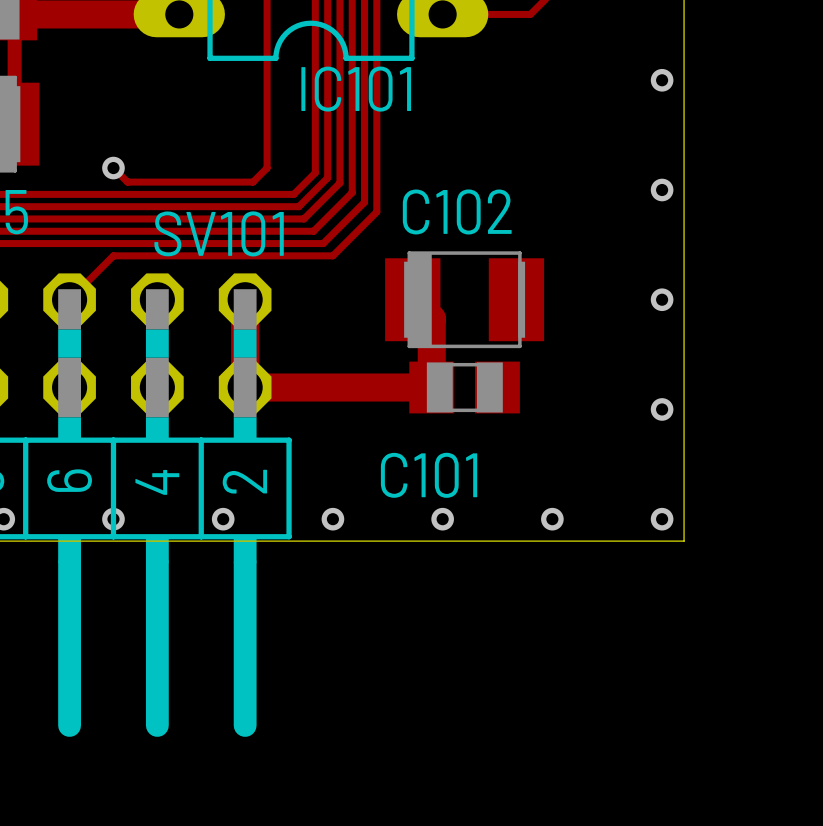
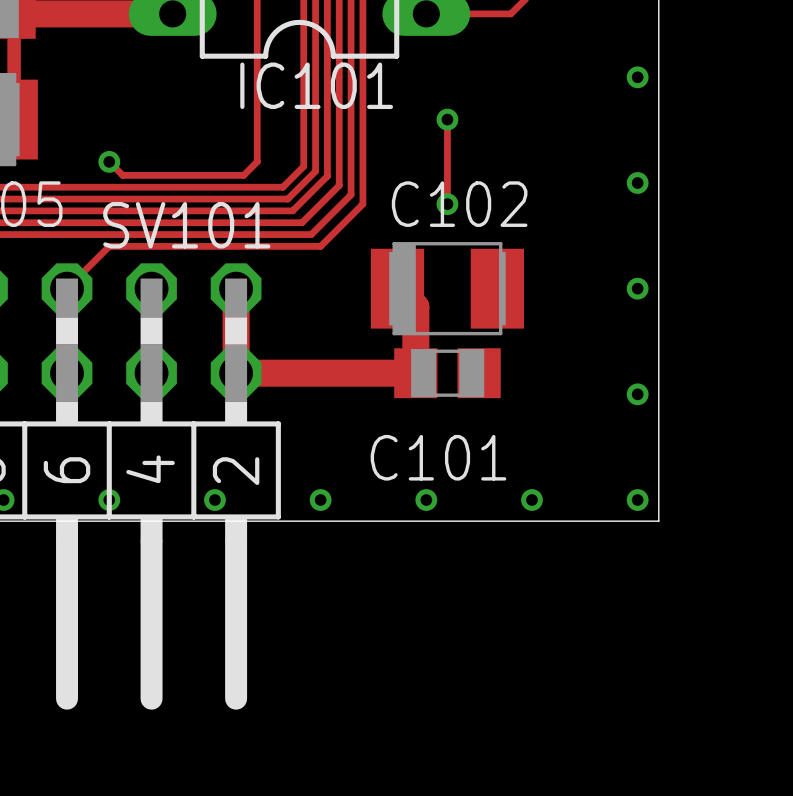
track: none -> (447, 119) (447, 204)
via: none -> (447, 119)
via: none -> (447, 204)

